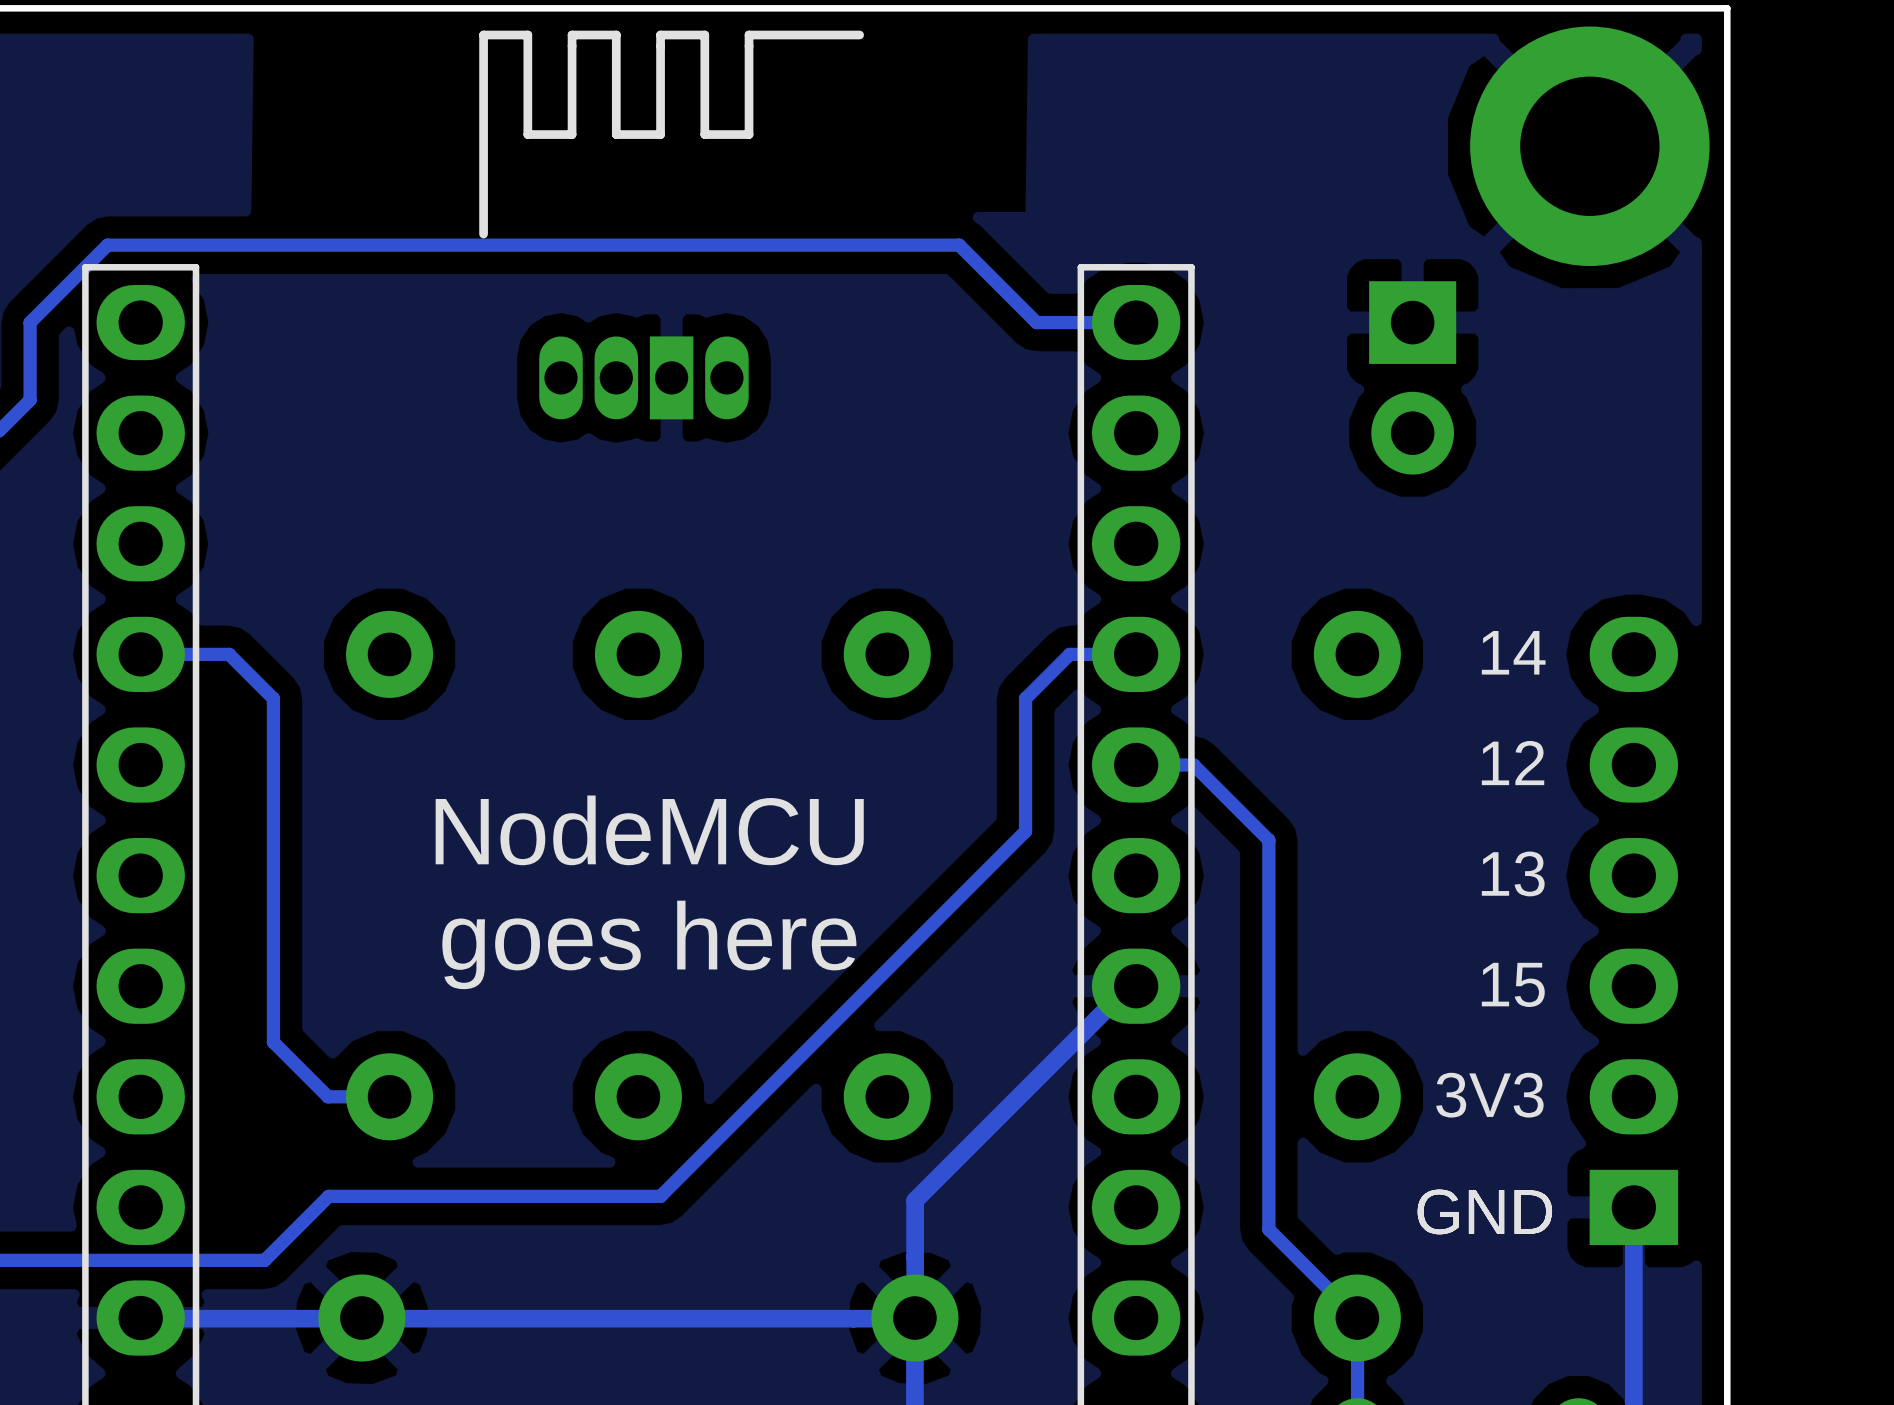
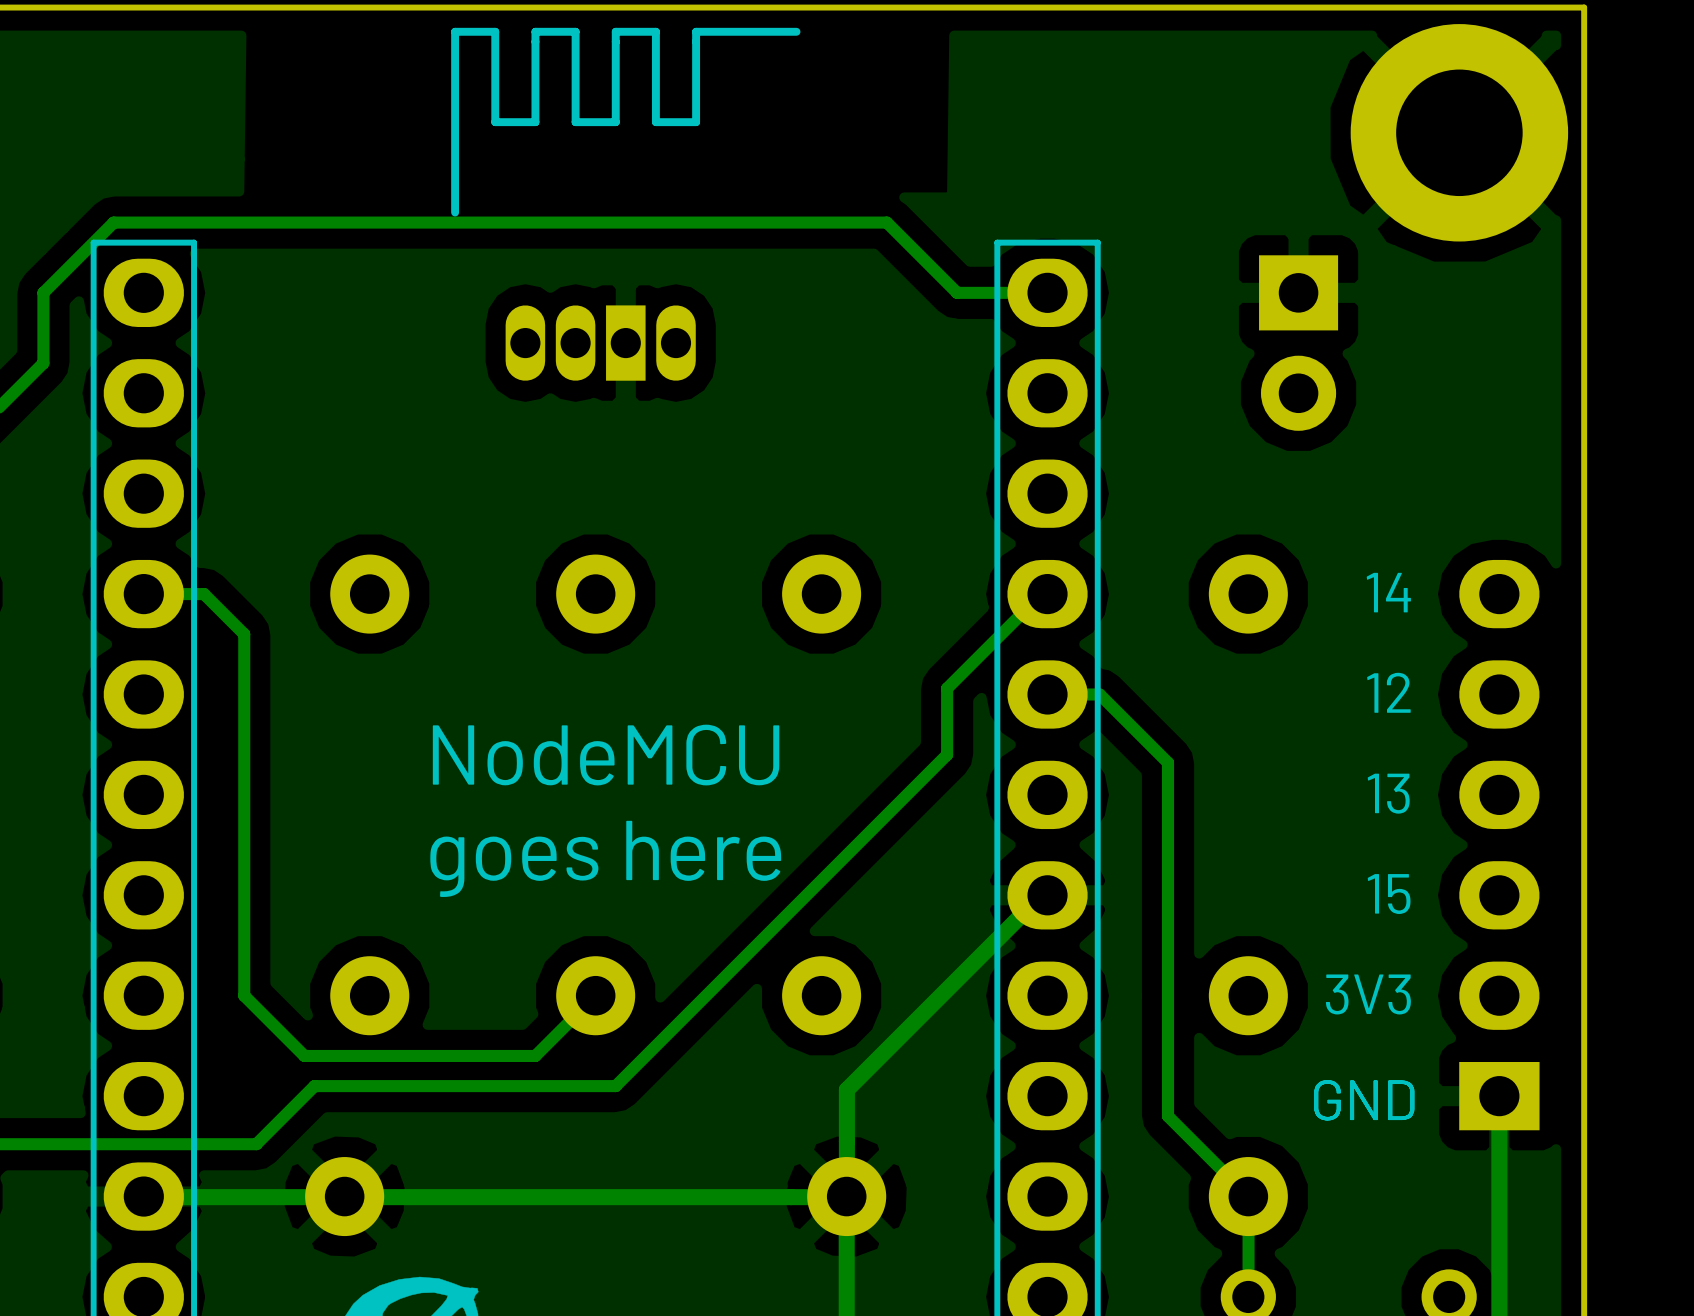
track: (207, 654) (229, 654) (273, 698) (273, 1042) (328, 1096) (389, 1096) -> (204, 594) (244, 634) (244, 995) (304, 1055) (535, 1055) (595, 995)
track: (1129, 654) (1069, 654) (1025, 698) (1025, 758) -> (1041, 594) (947, 688)

